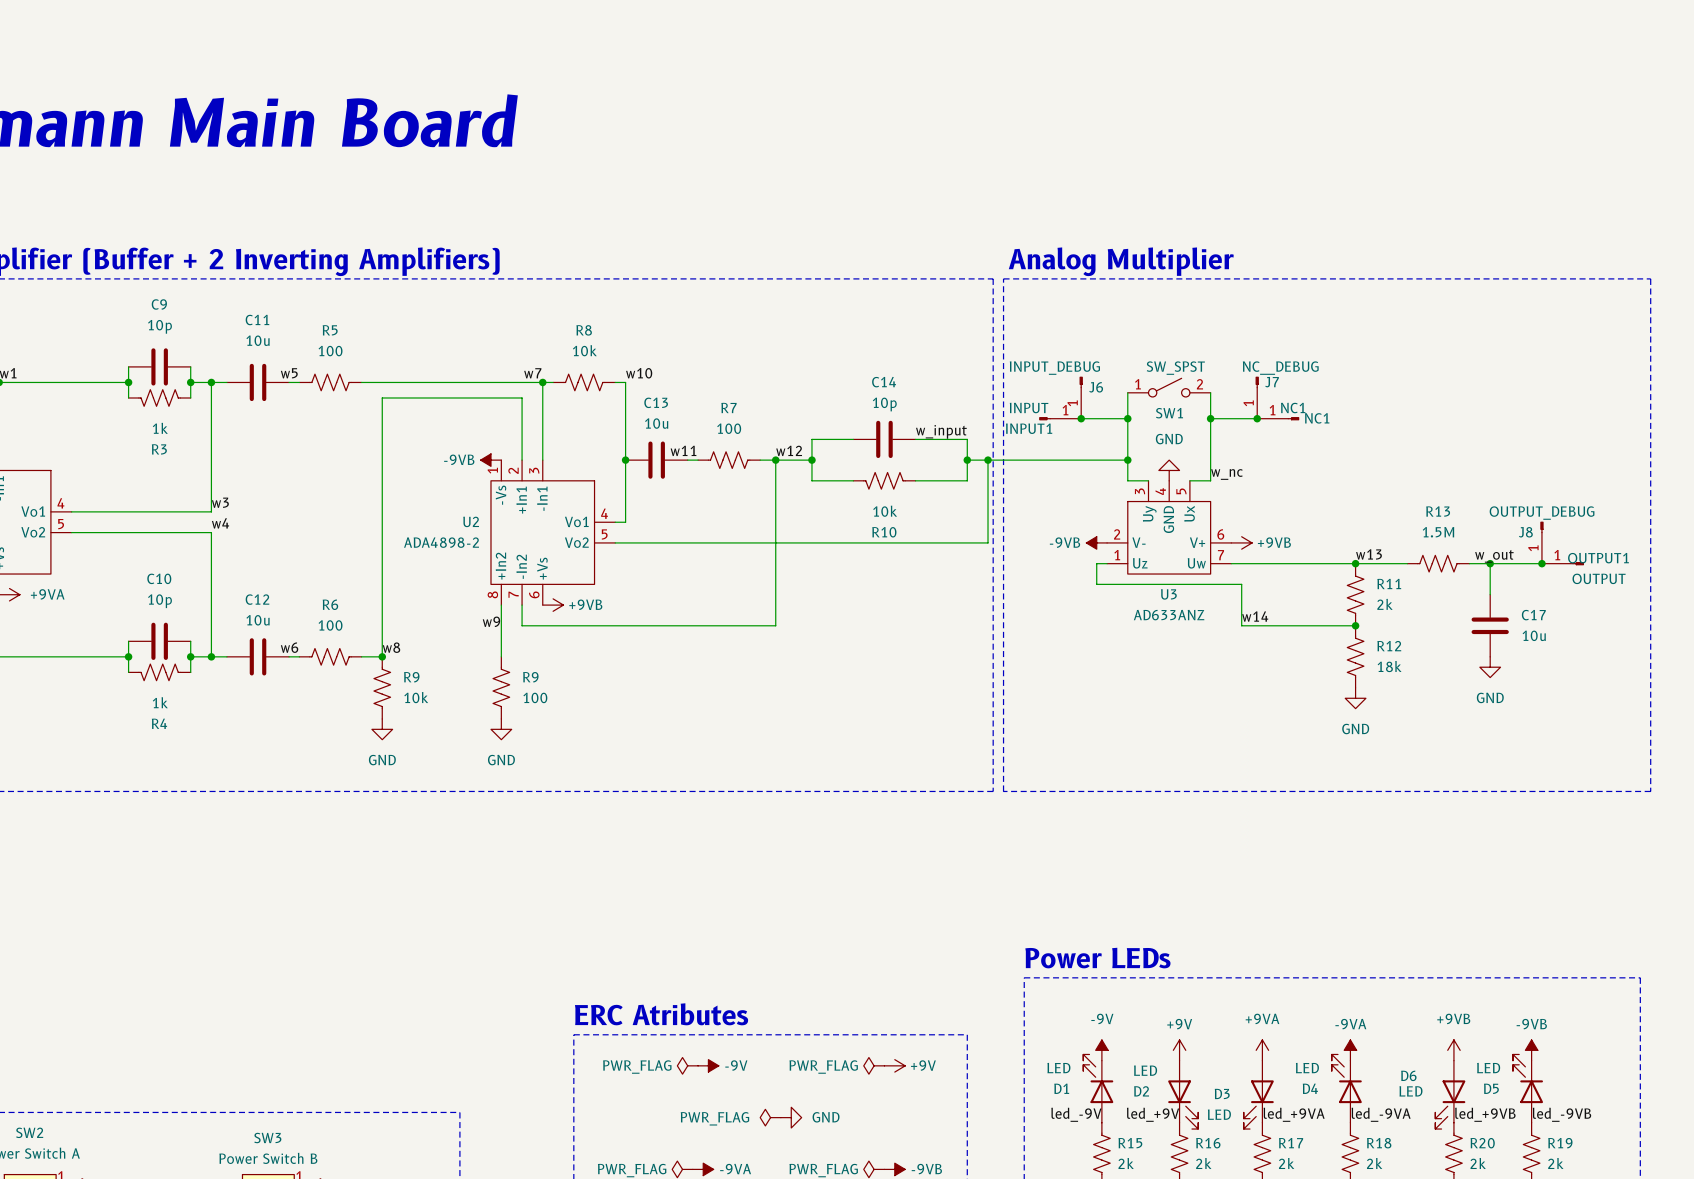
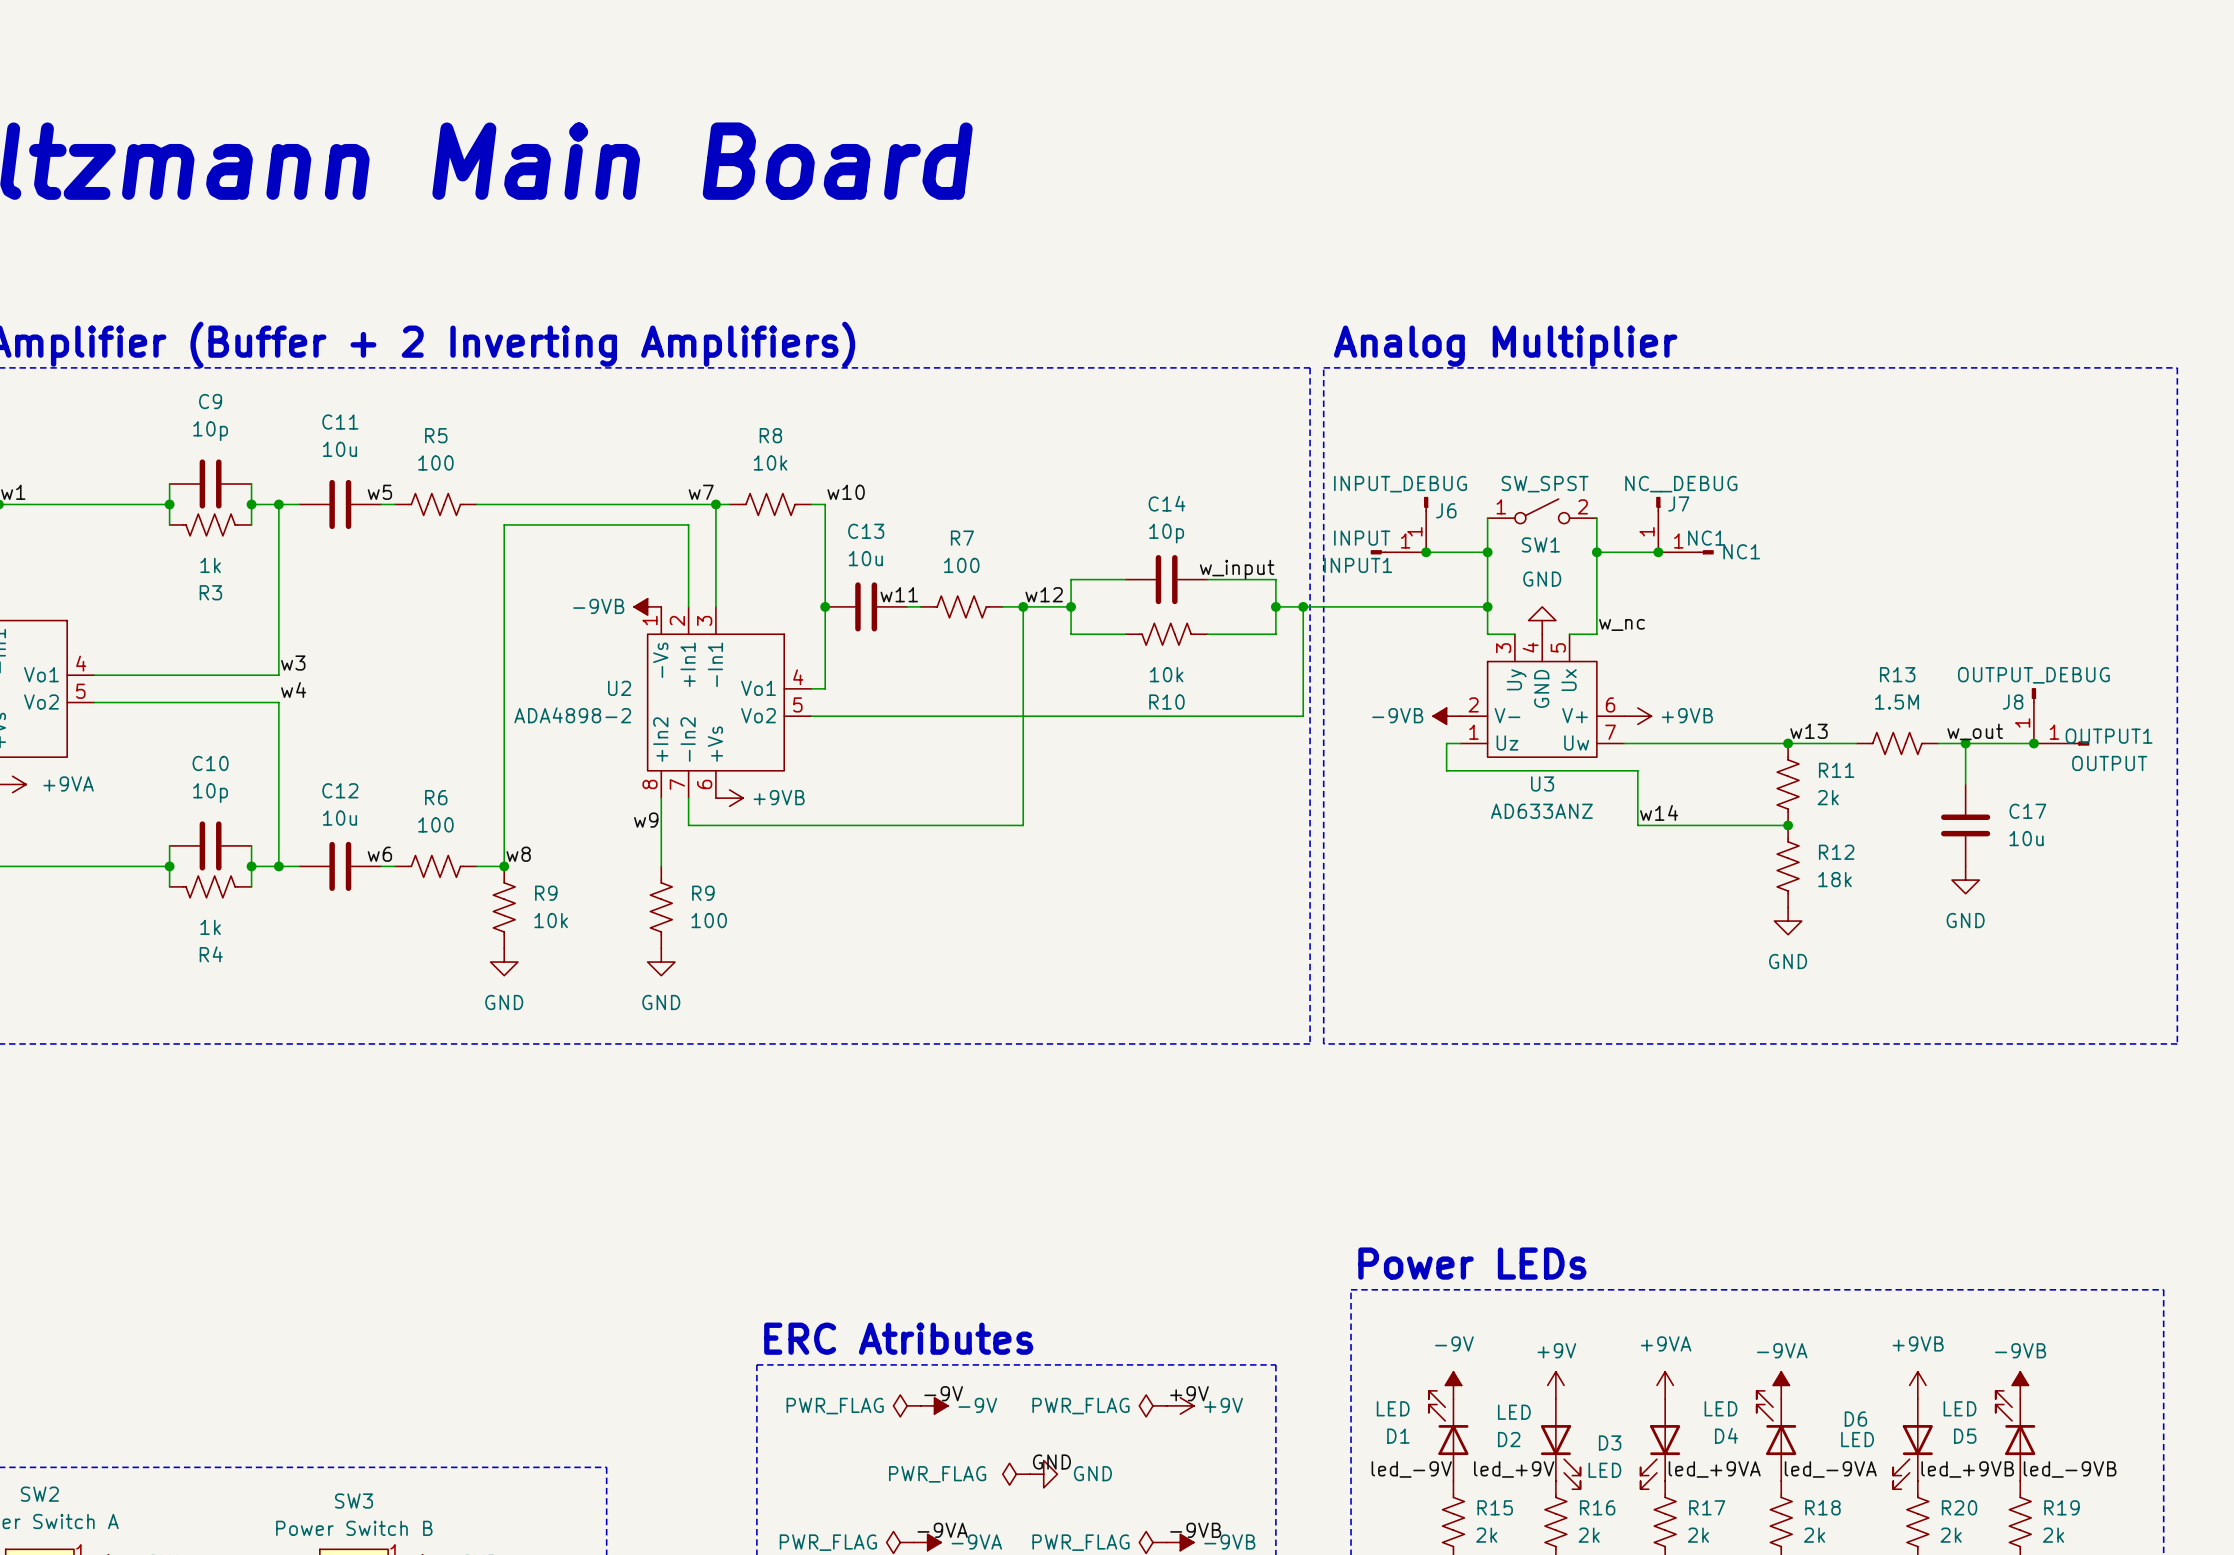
label: none -> -9V (943, 1393)
label: none -> +9V (1189, 1393)
label: none -> GND (1051, 1462)
label: none -> -9VA (942, 1530)
label: none -> -9VB (1195, 1530)

